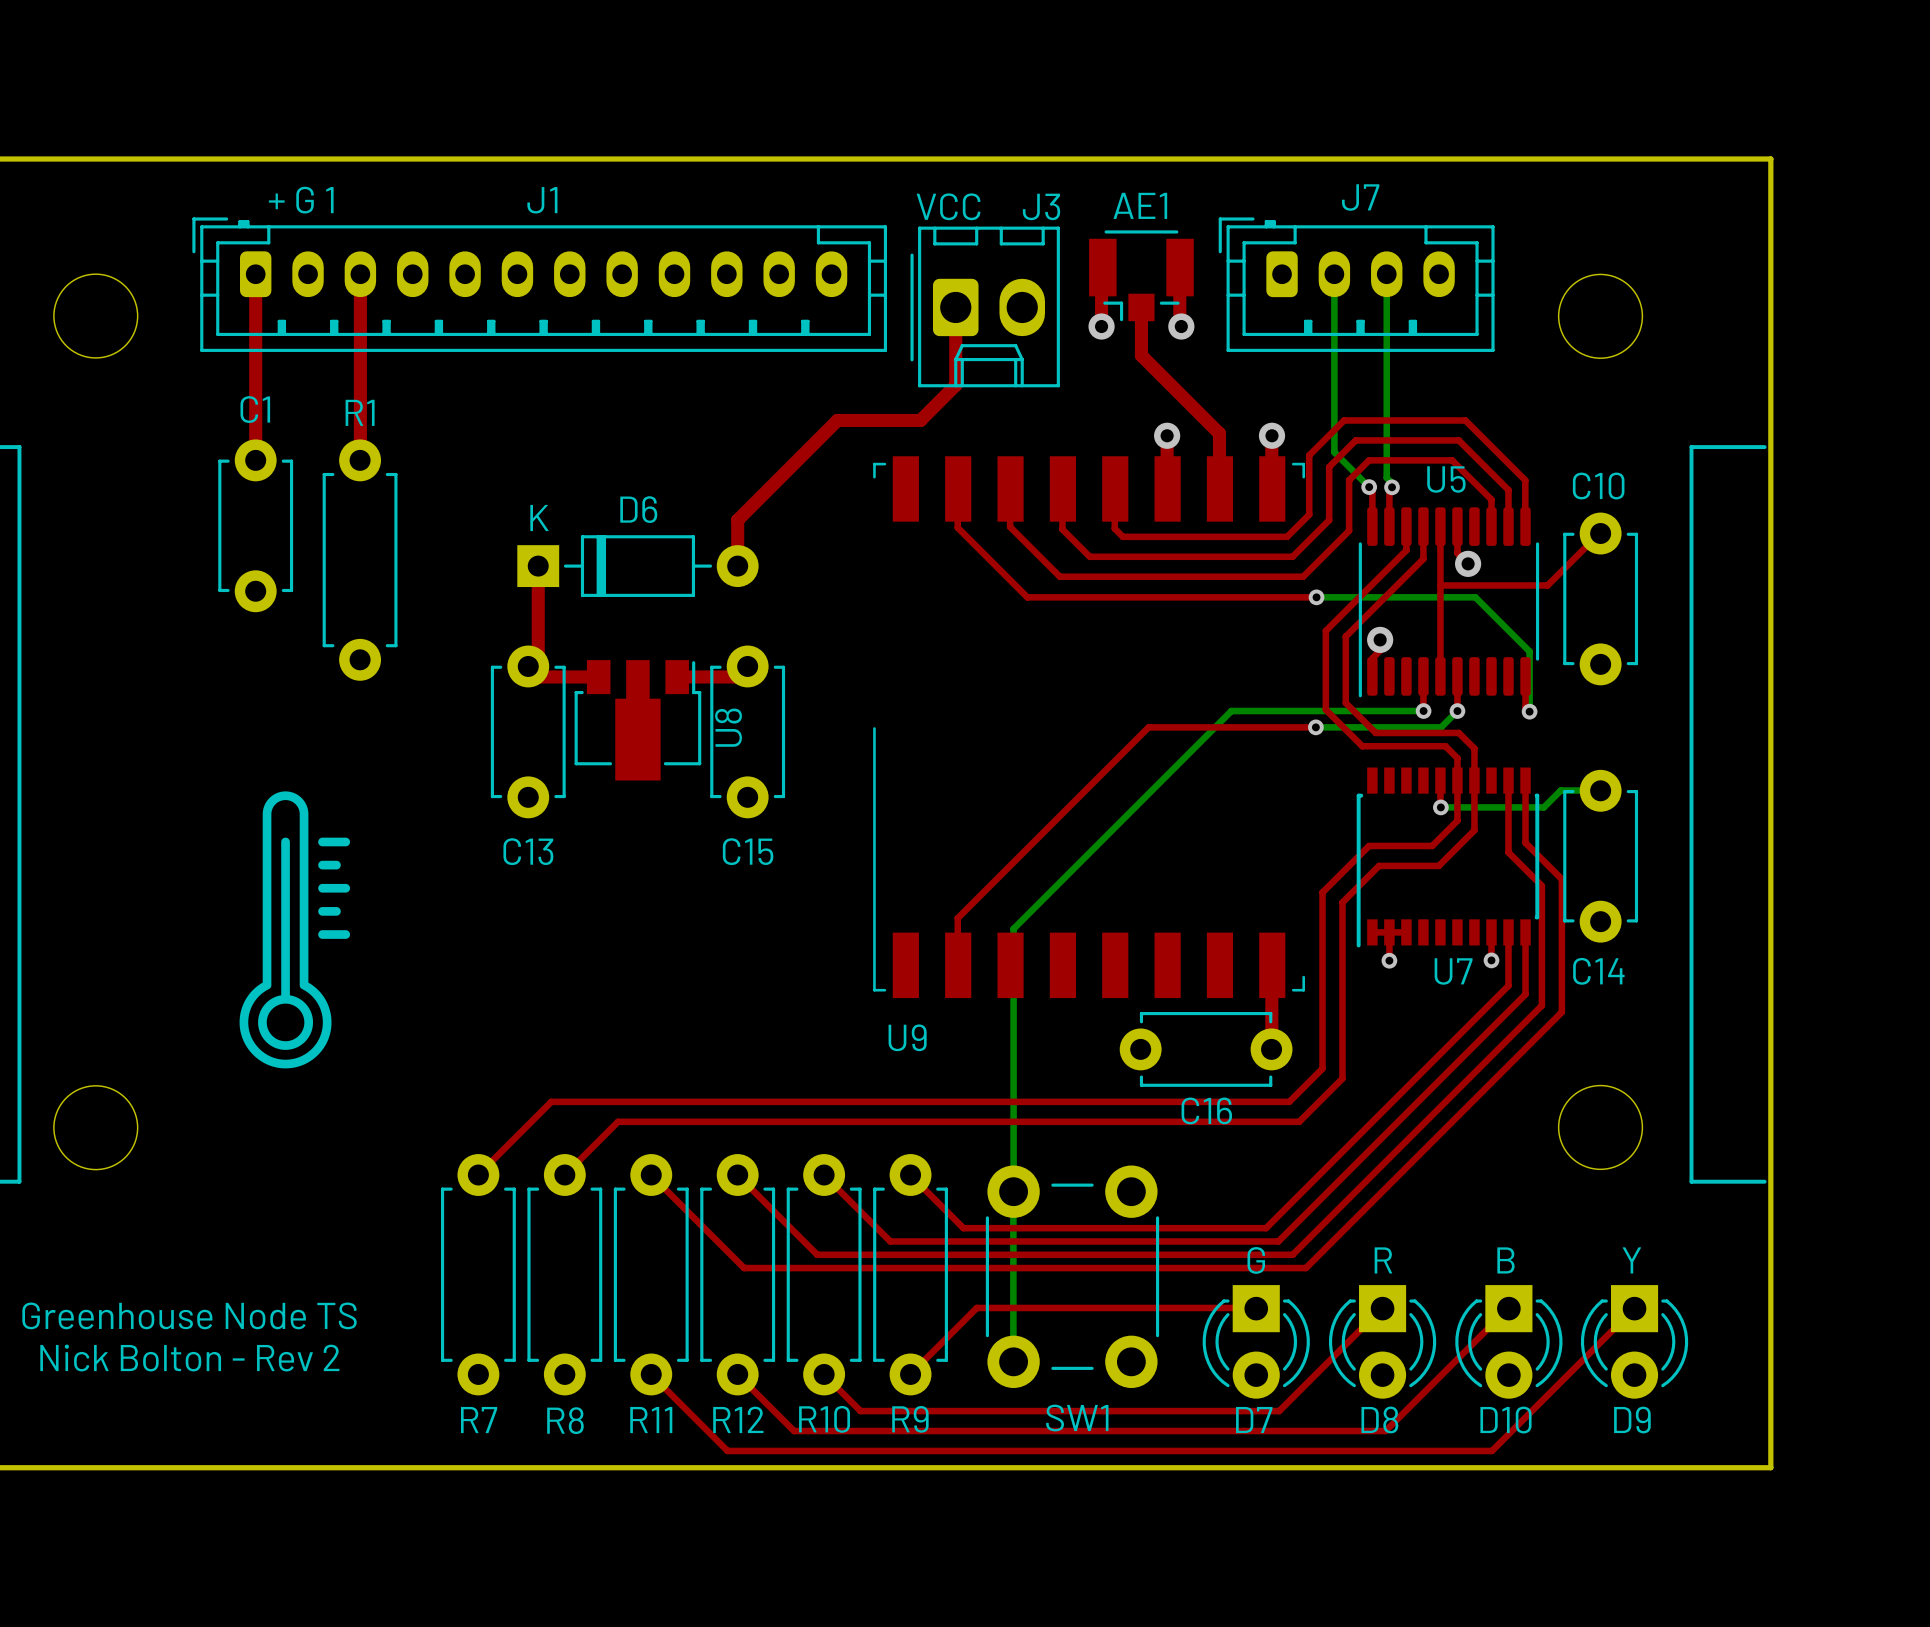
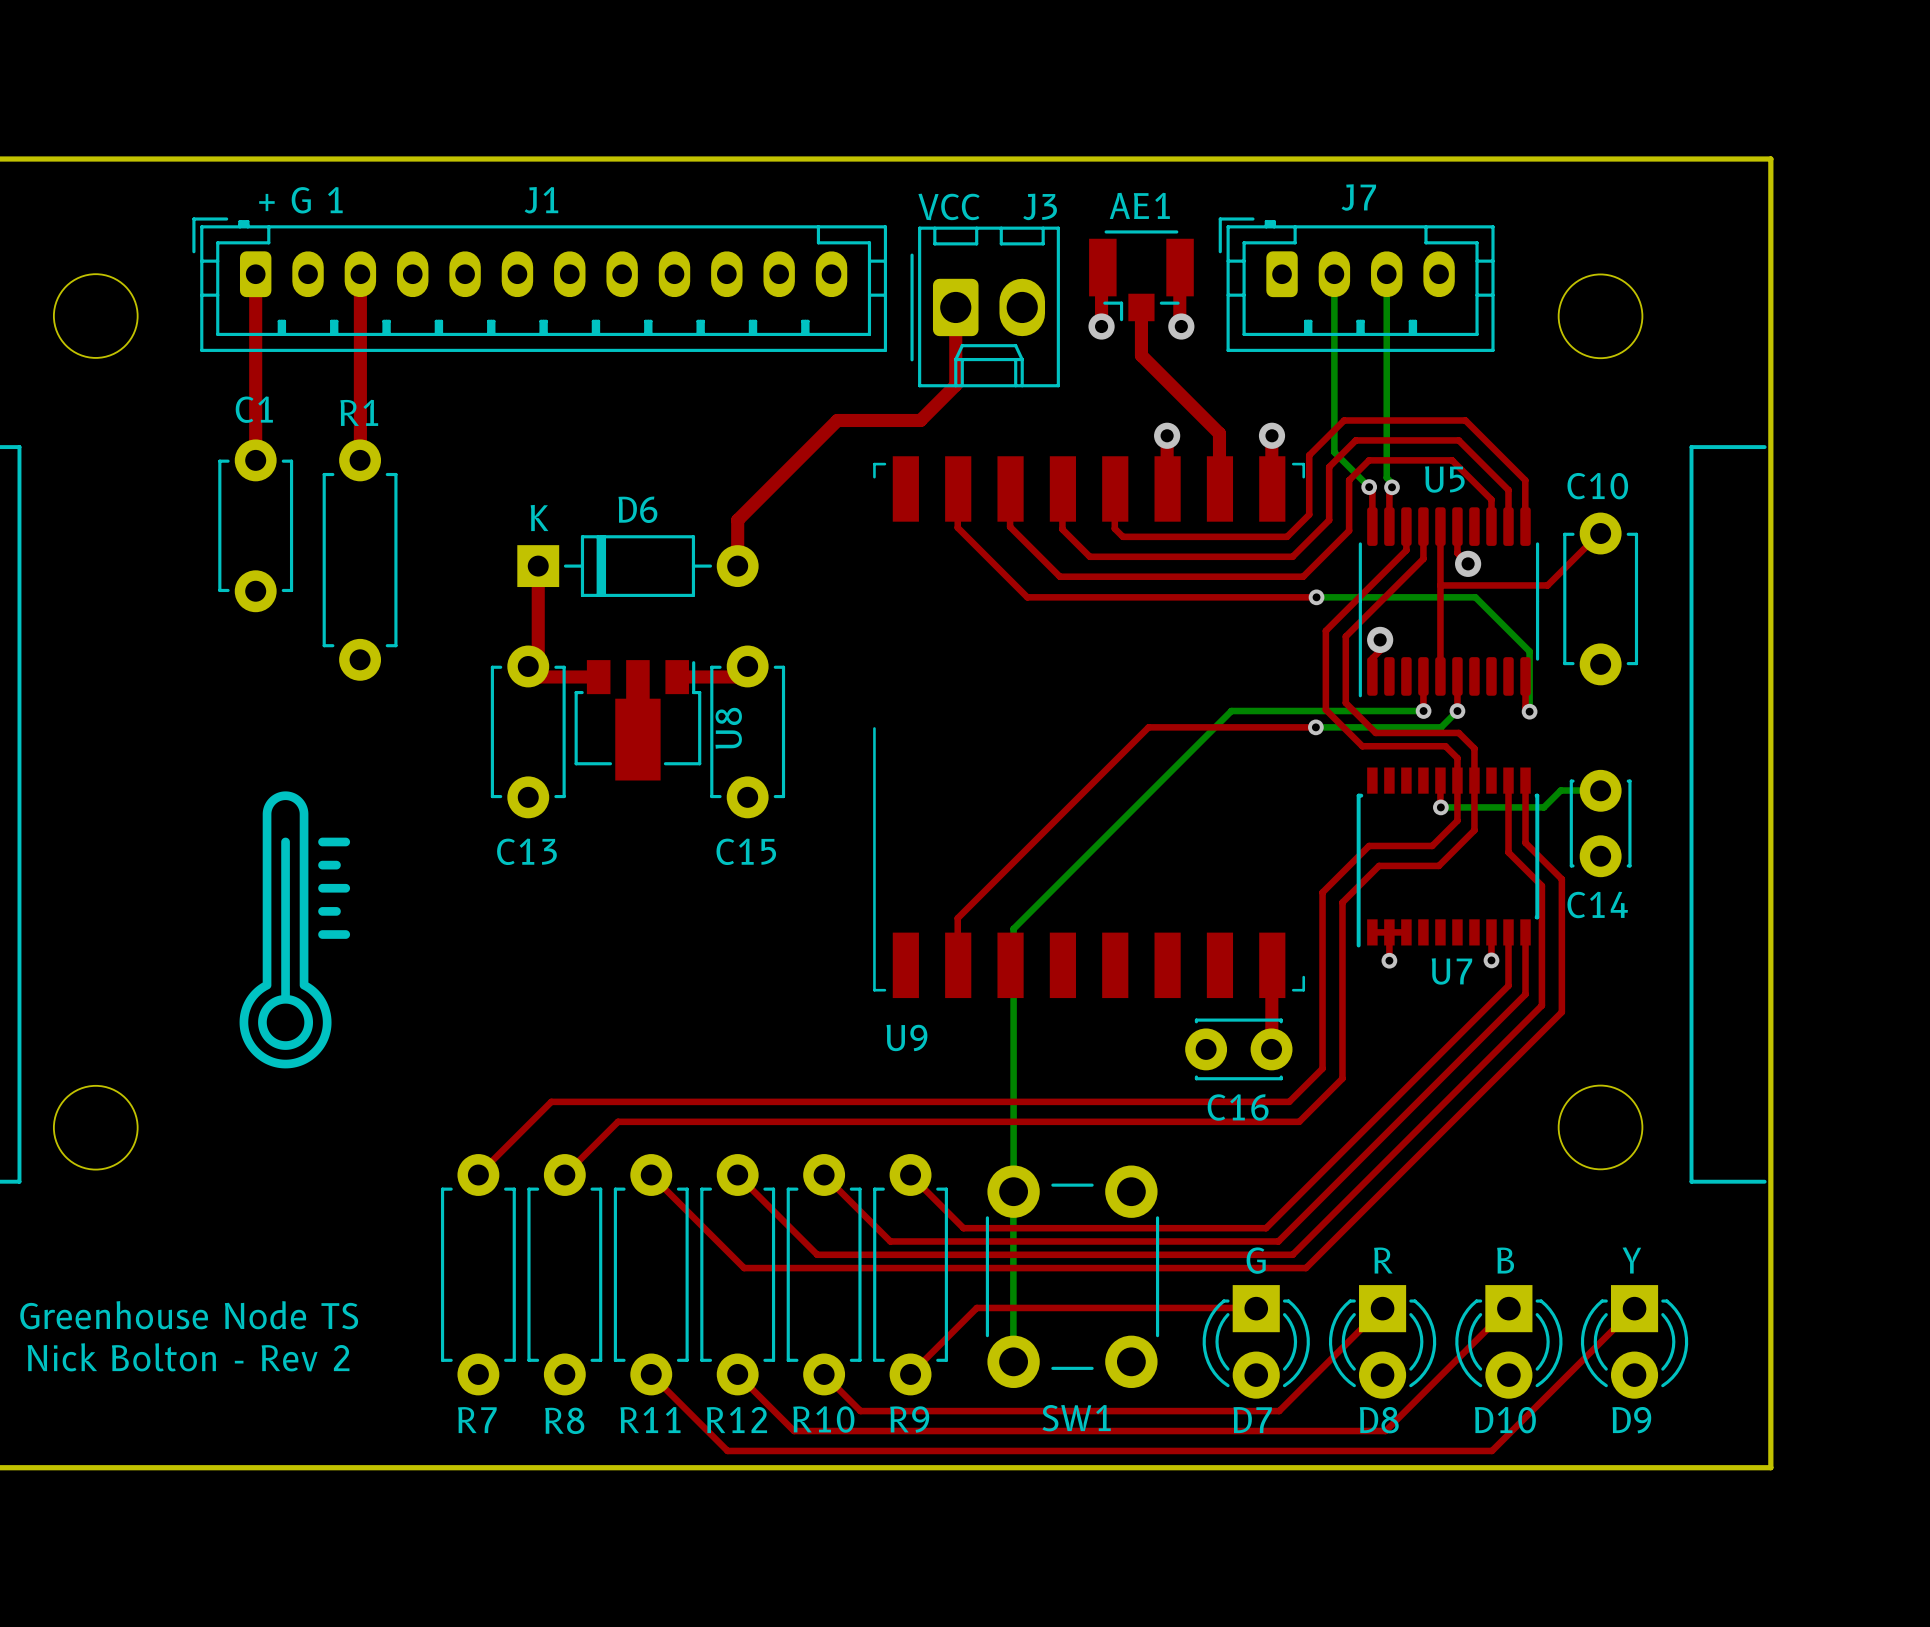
C14 footprint: [1563, 769, 1639, 943] -> [1569, 769, 1632, 878]
C16 footprint: [1119, 1011, 1293, 1087] -> [1185, 1018, 1293, 1081]

